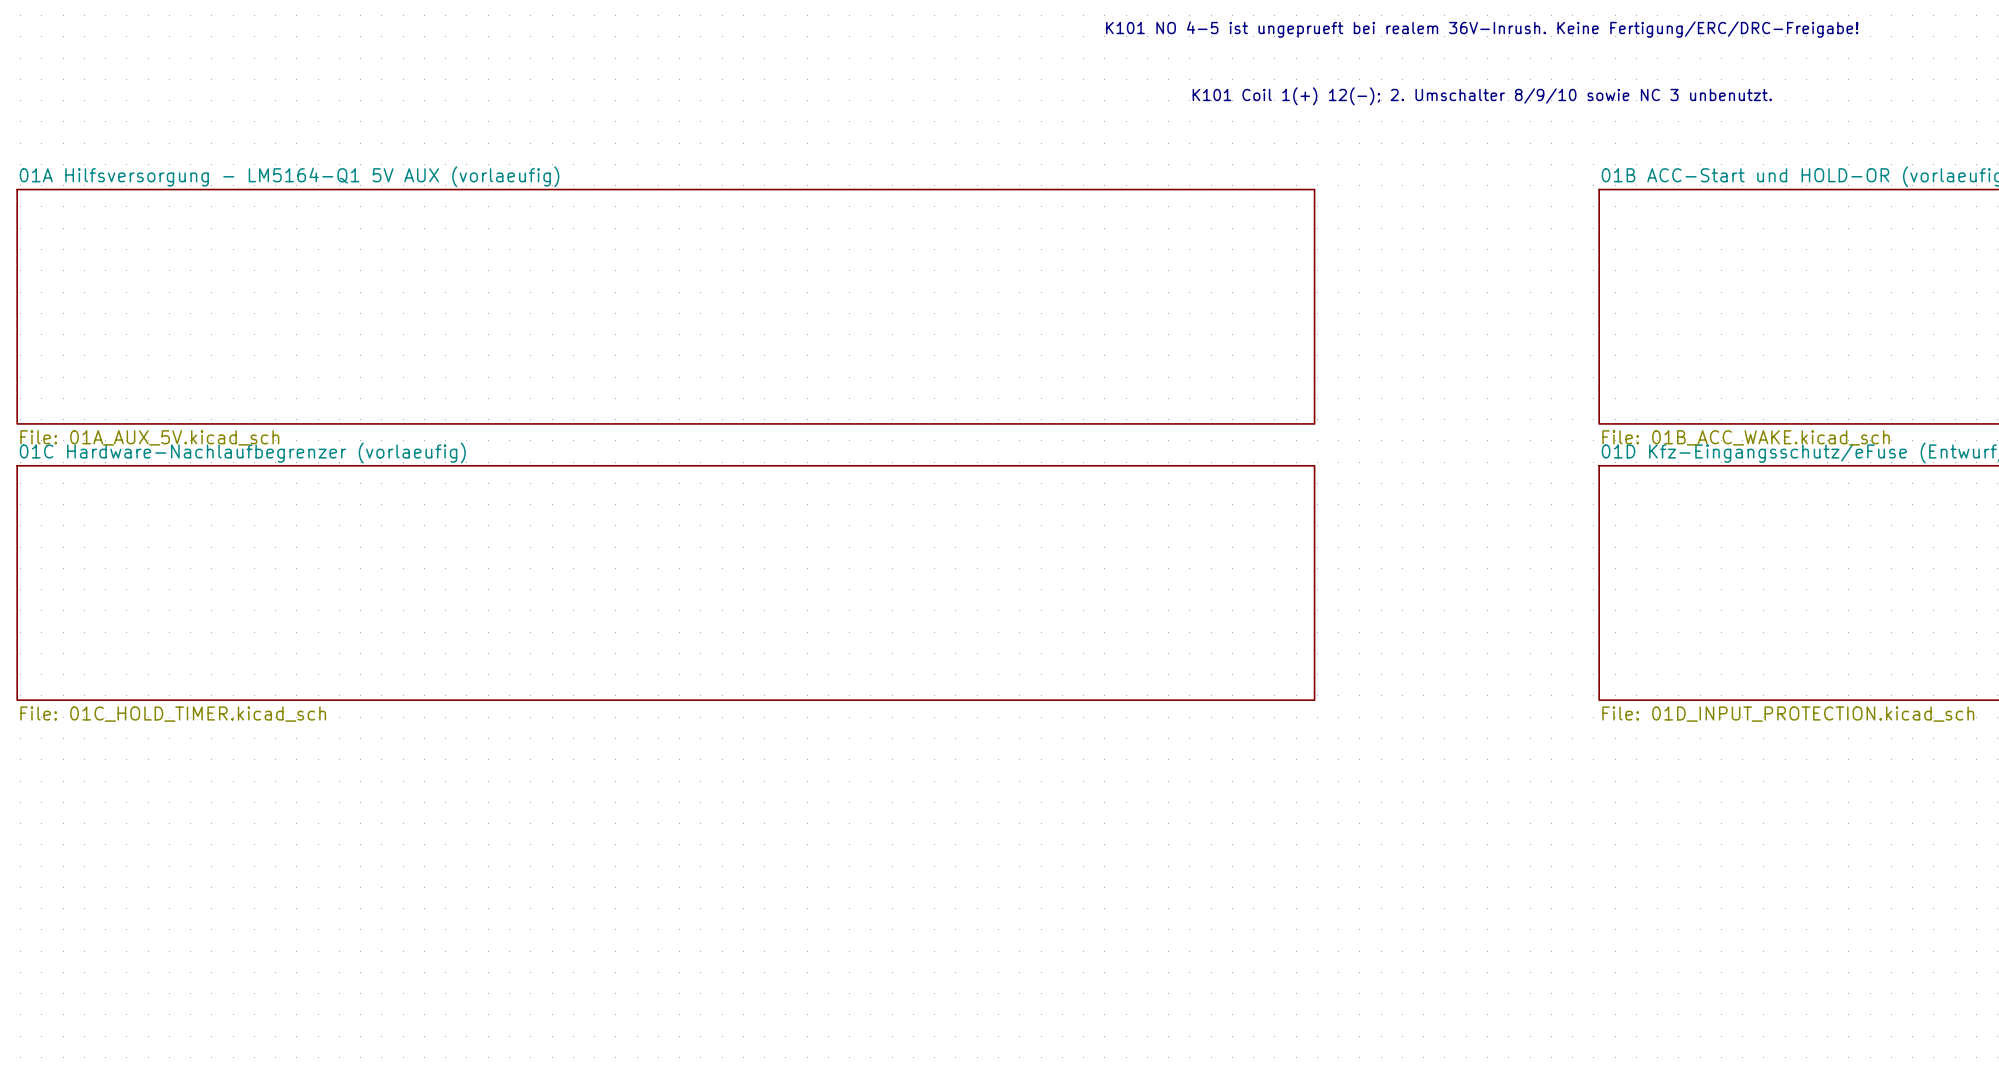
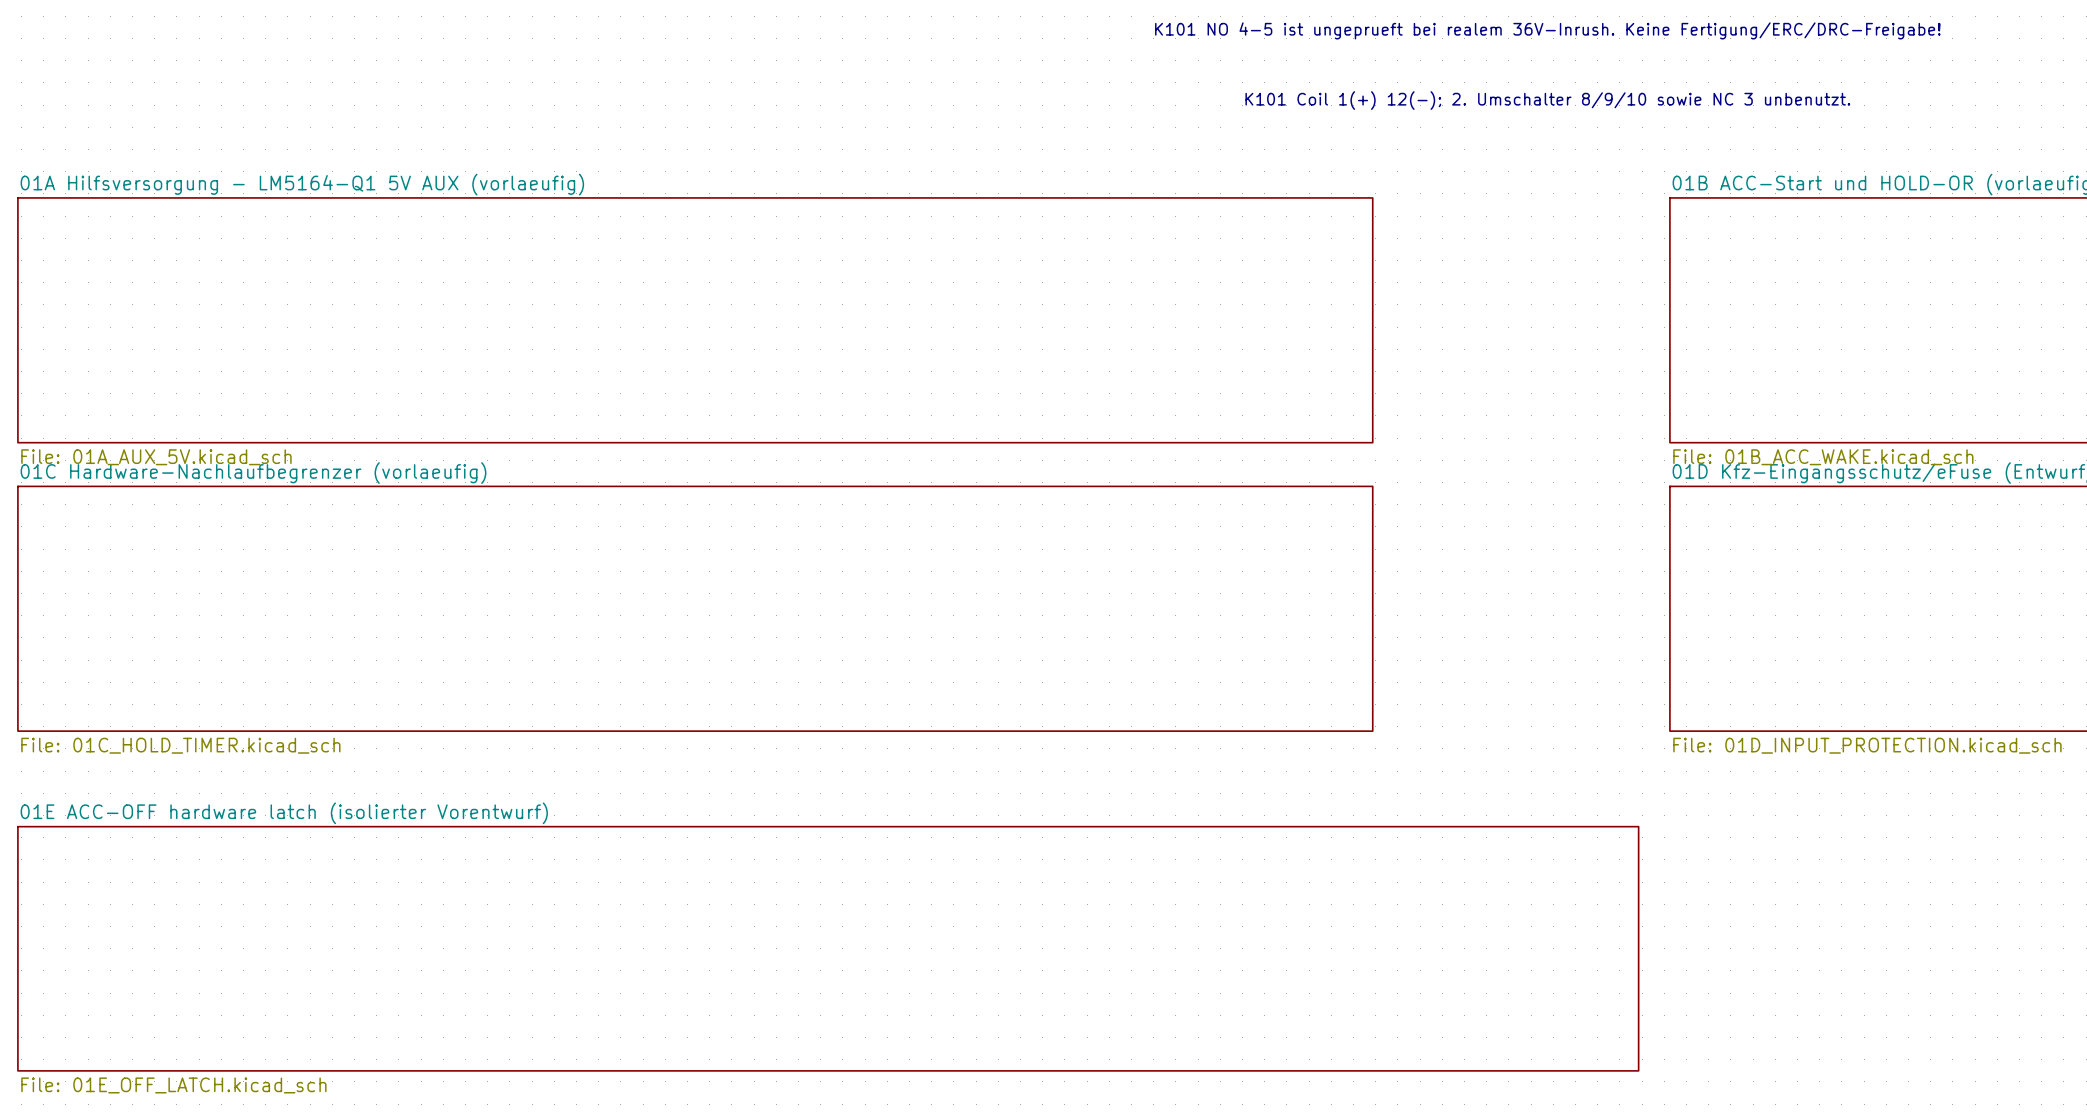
sheet 01E ACC-OFF hardware latch (isolierter Vorentwurf): none -> File: 01E_OFF_LATCH.kicad_sch (828, 948)

